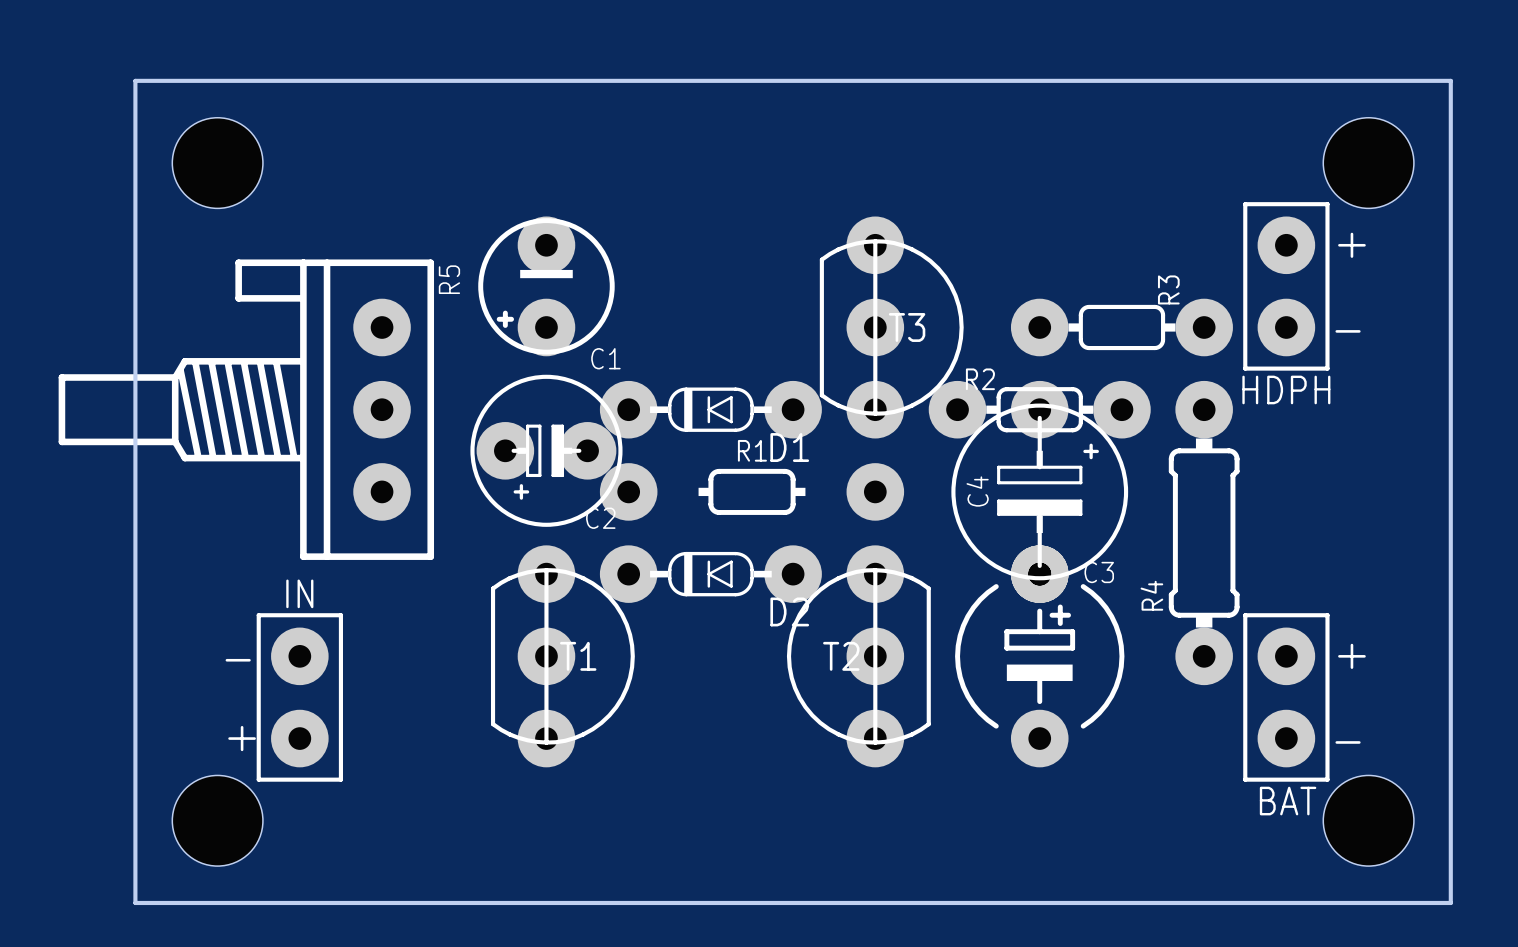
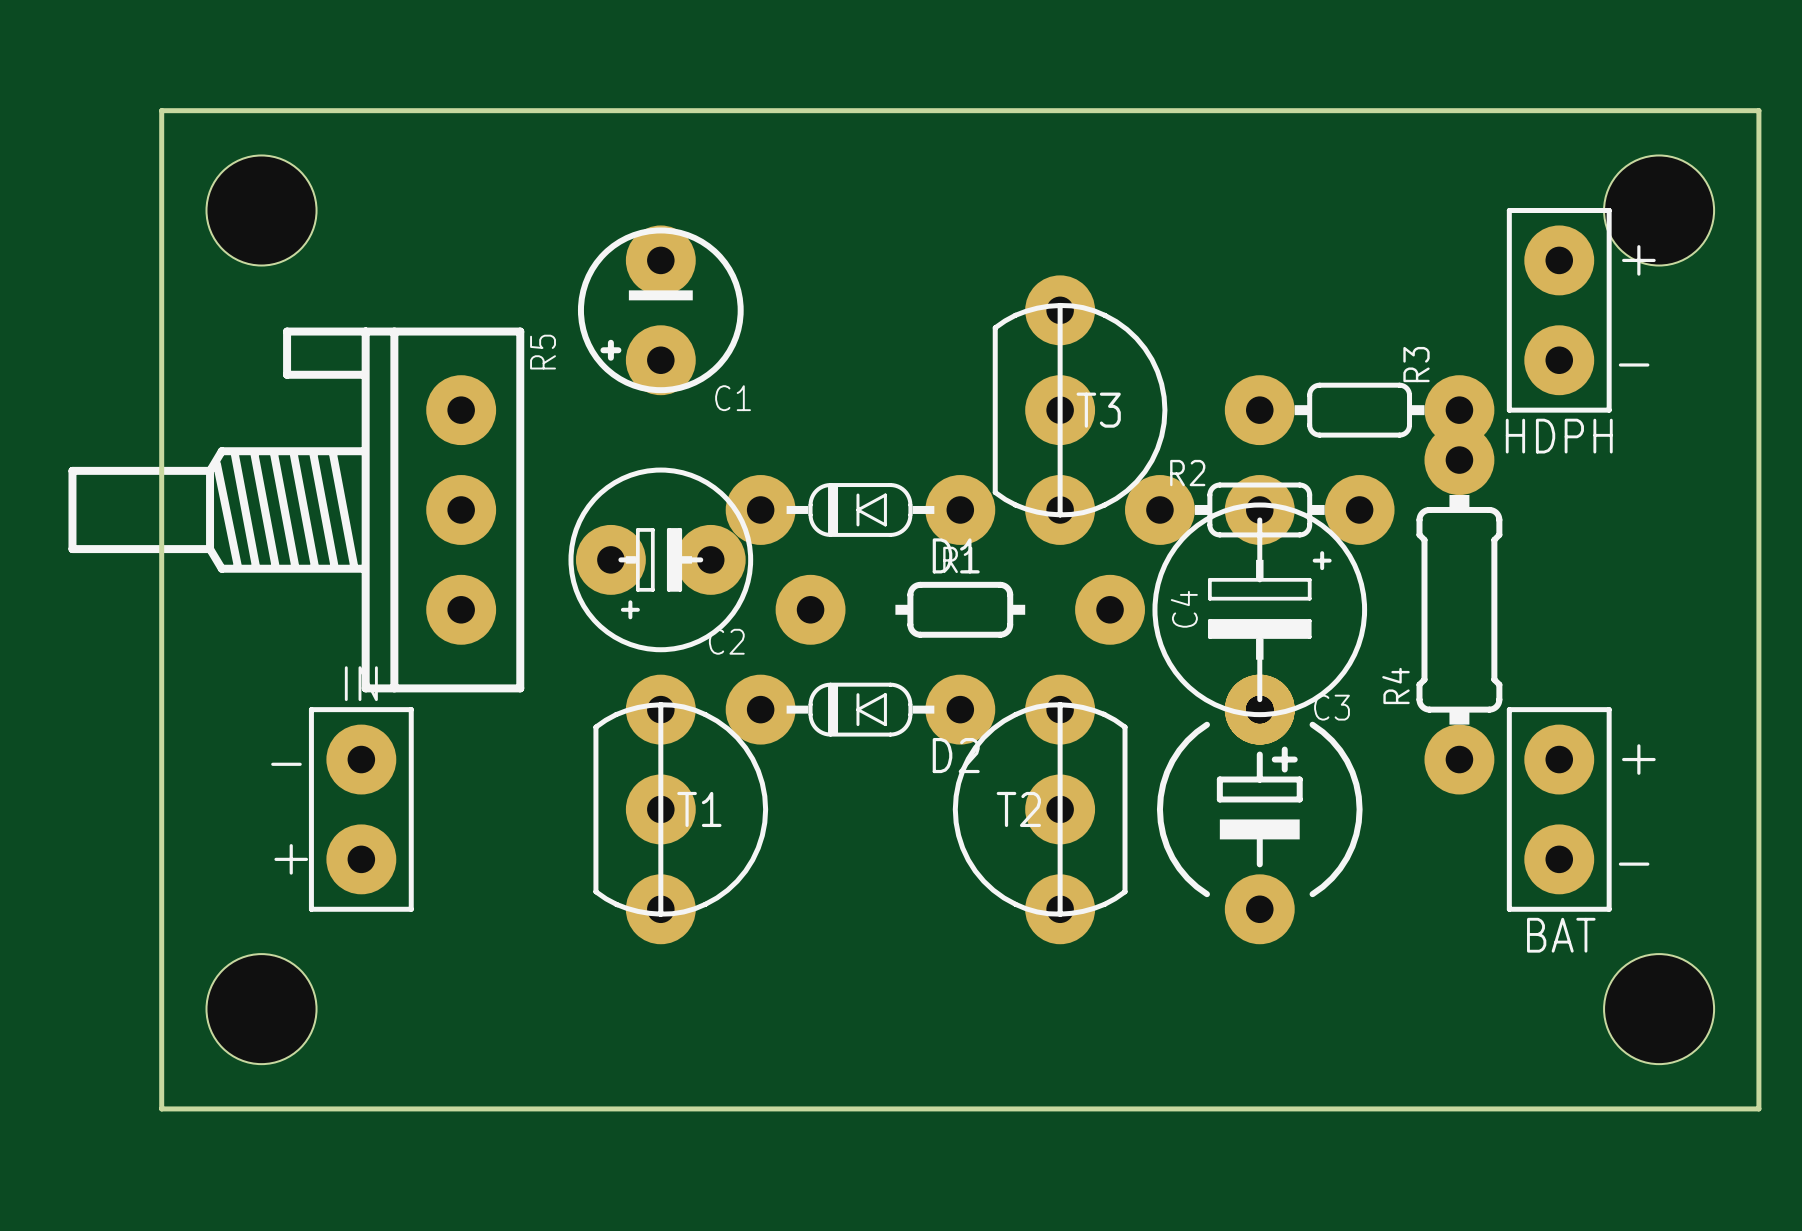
C1 position: (546, 286) -> (660, 310)
HDPH position: (1286, 286) -> (1559, 310)
R1 position: (752, 491) -> (960, 609)
R4 position: (1204, 533) -> (1459, 609)
IN position: (299, 697) -> (361, 809)
BAT position: (1286, 697) -> (1559, 809)

